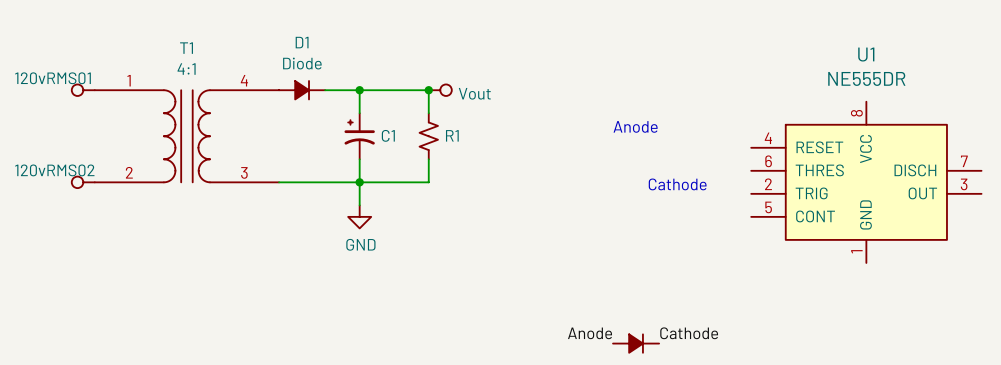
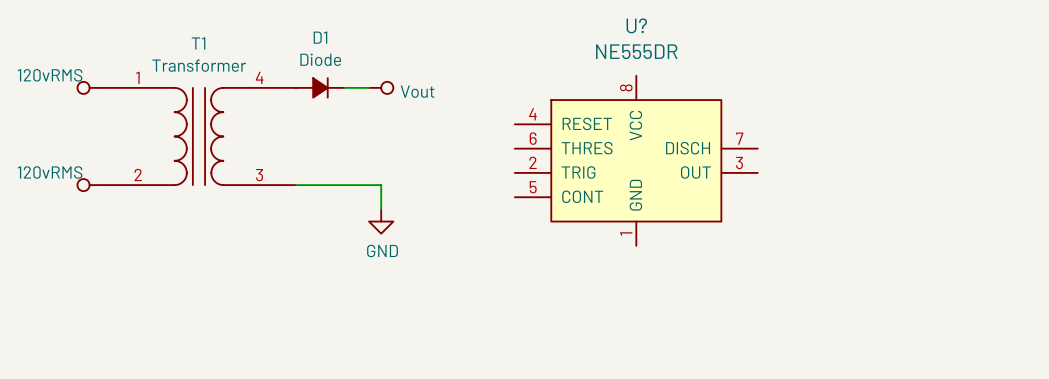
T1 value: 4:1 (186, 69) -> Transformer (199, 65)
120vRMS01 name: 120vRMS01 (53, 78) -> 120vRMS (50, 75)
wire: (348, 90) (428, 90) (428, 113) -> none
wire: (359, 90) (359, 113) -> none
junction: (359, 90) -> none
junction: (428, 90) -> none
Vout position: (440, 90) -> (381, 87)
text: Anode (635, 126) -> none
C1: (359, 136) -> none
R1: (428, 136) -> none
wire: (359, 159) (359, 182) (428, 182) (428, 159) -> none
U?: none -> NE555DR (636, 160)
120vRMS02 name: 120vRMS02 (54, 170) -> 120vRMS (50, 172)
junction: (359, 182) -> none
U1: NE555DR (866, 182) -> none
text: Cathode (677, 184) -> none
label: Anode (590, 333) -> none
label: Cathode (689, 333) -> none
part: (636, 343) -> none

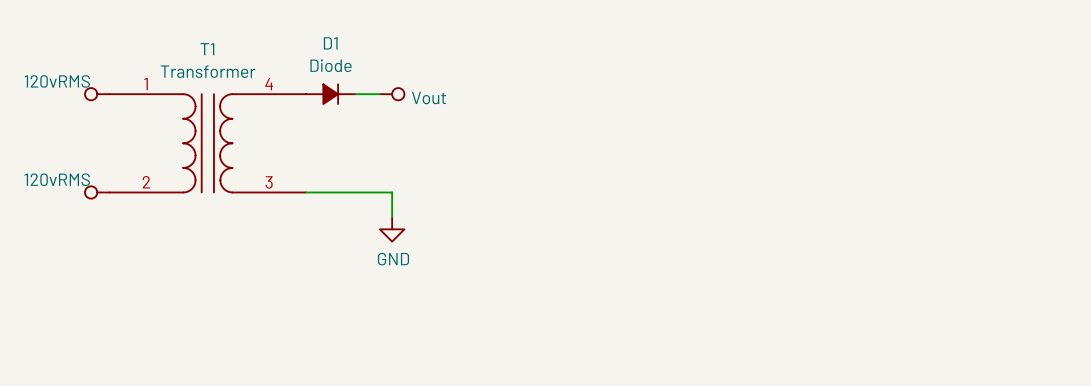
U?: NE555DR (636, 160) -> none

